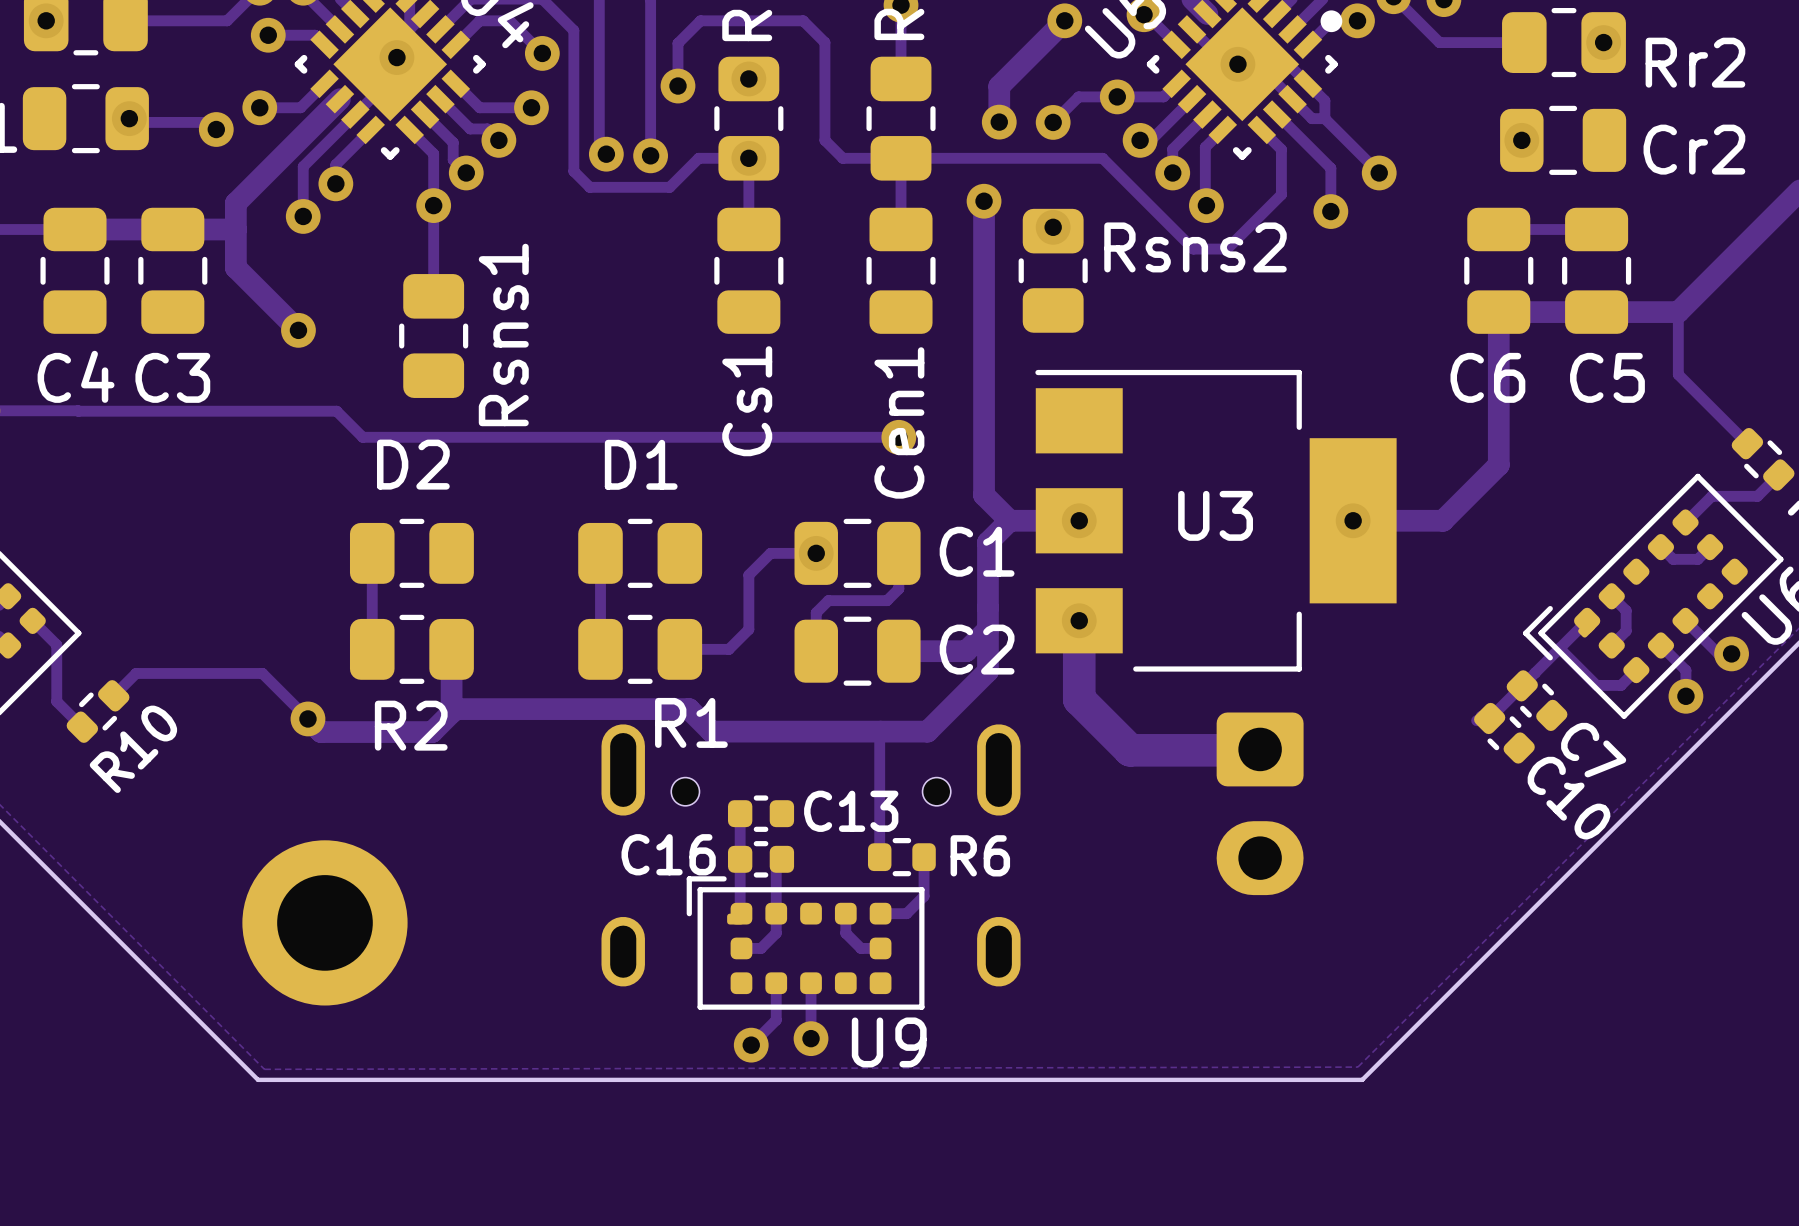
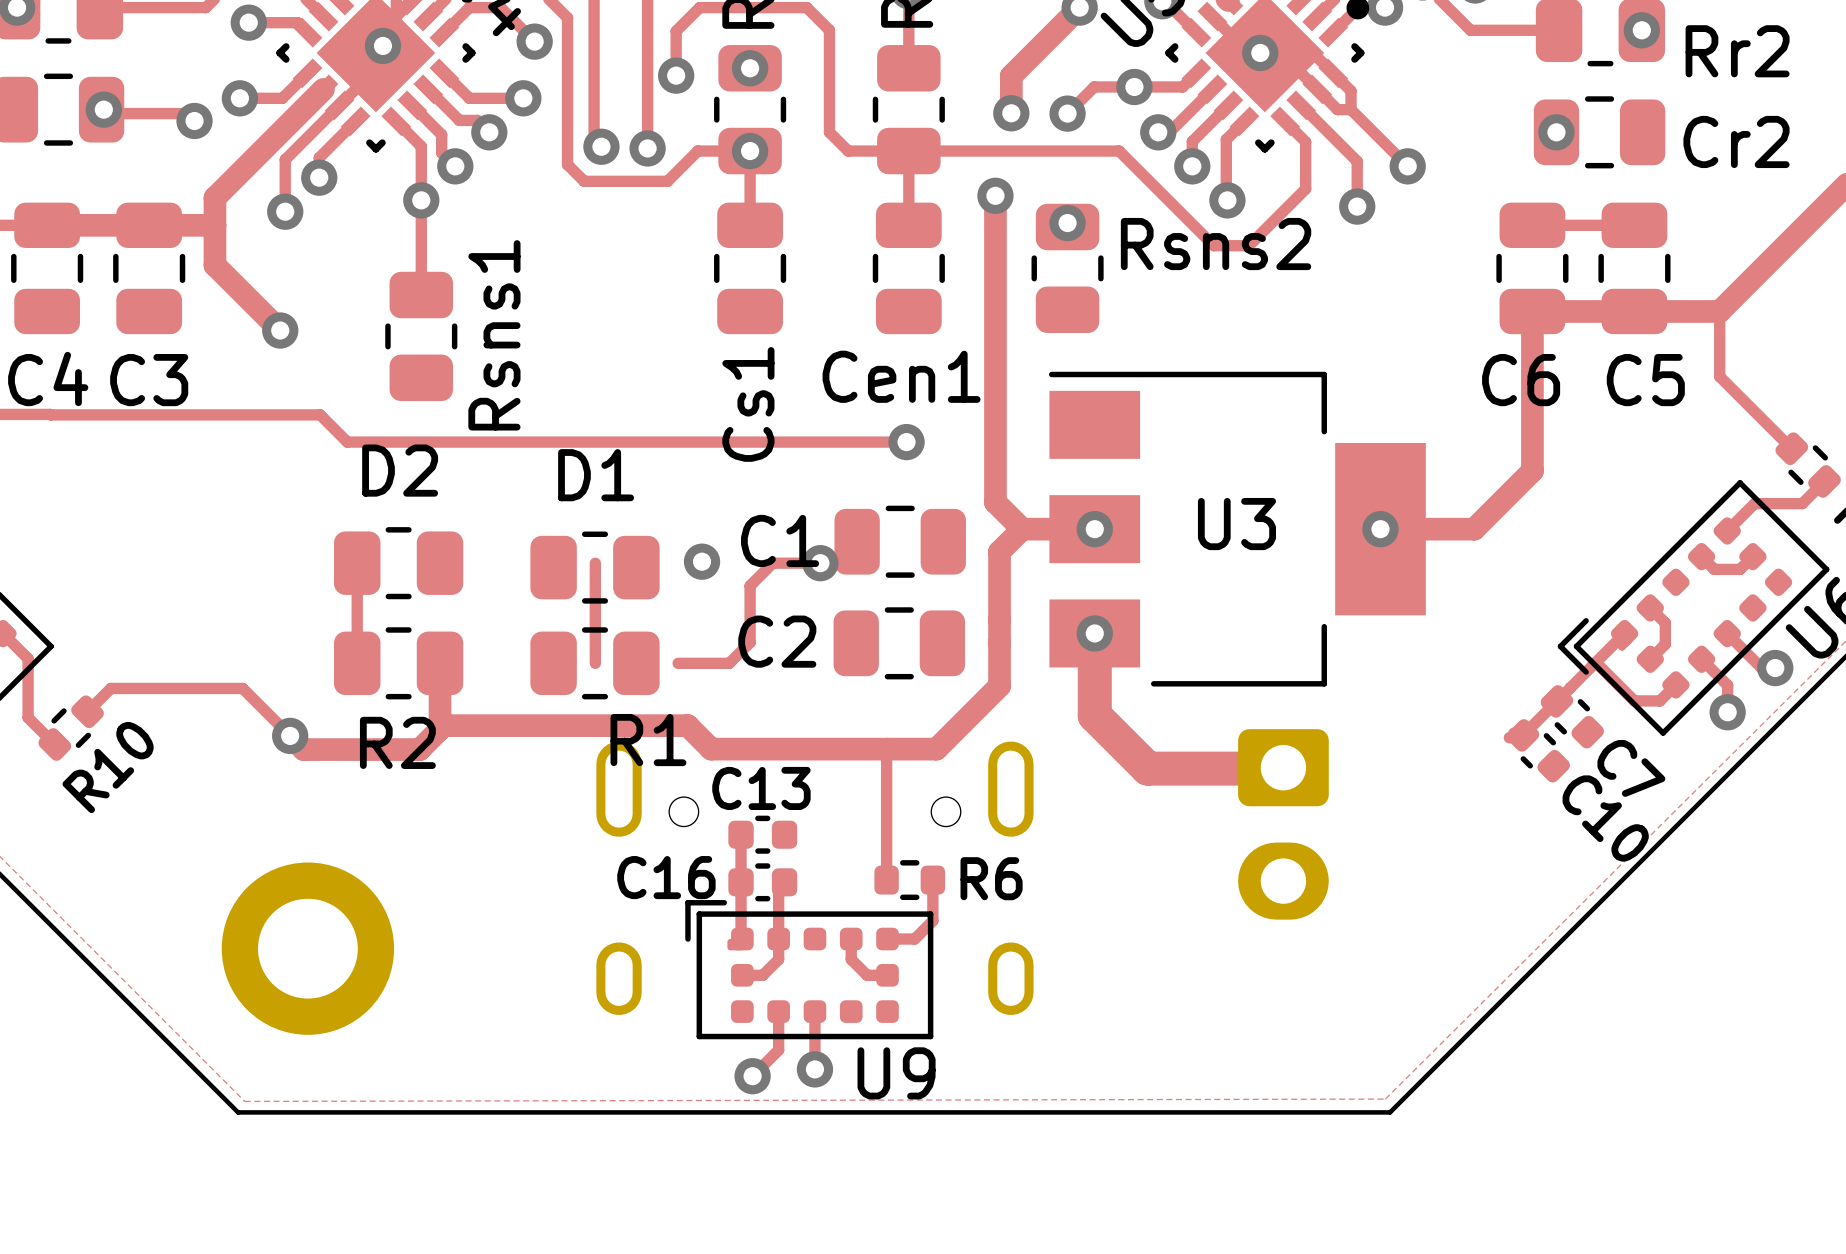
Cen1 name rotation: 0° (899, 422) -> 90° clockwise (901, 376)
via: none -> (702, 561)
C1 name position: C1 (977, 551) -> C1 (780, 540)
D1 position: (640, 553) -> (595, 567)
C1 position: (857, 553) -> (900, 541)
track: (898, 553) (898, 588) (887, 600) (828, 600) (816, 612) (816, 651) -> none
track: (987, 629) (966, 651) (898, 651) -> none
R1 position: (640, 649) -> (595, 663)
C2 name position: C2 (977, 649) -> C2 (777, 641)
C2 position: (857, 651) -> (899, 643)
C13 name position: C13 (851, 811) -> C13 (761, 788)

